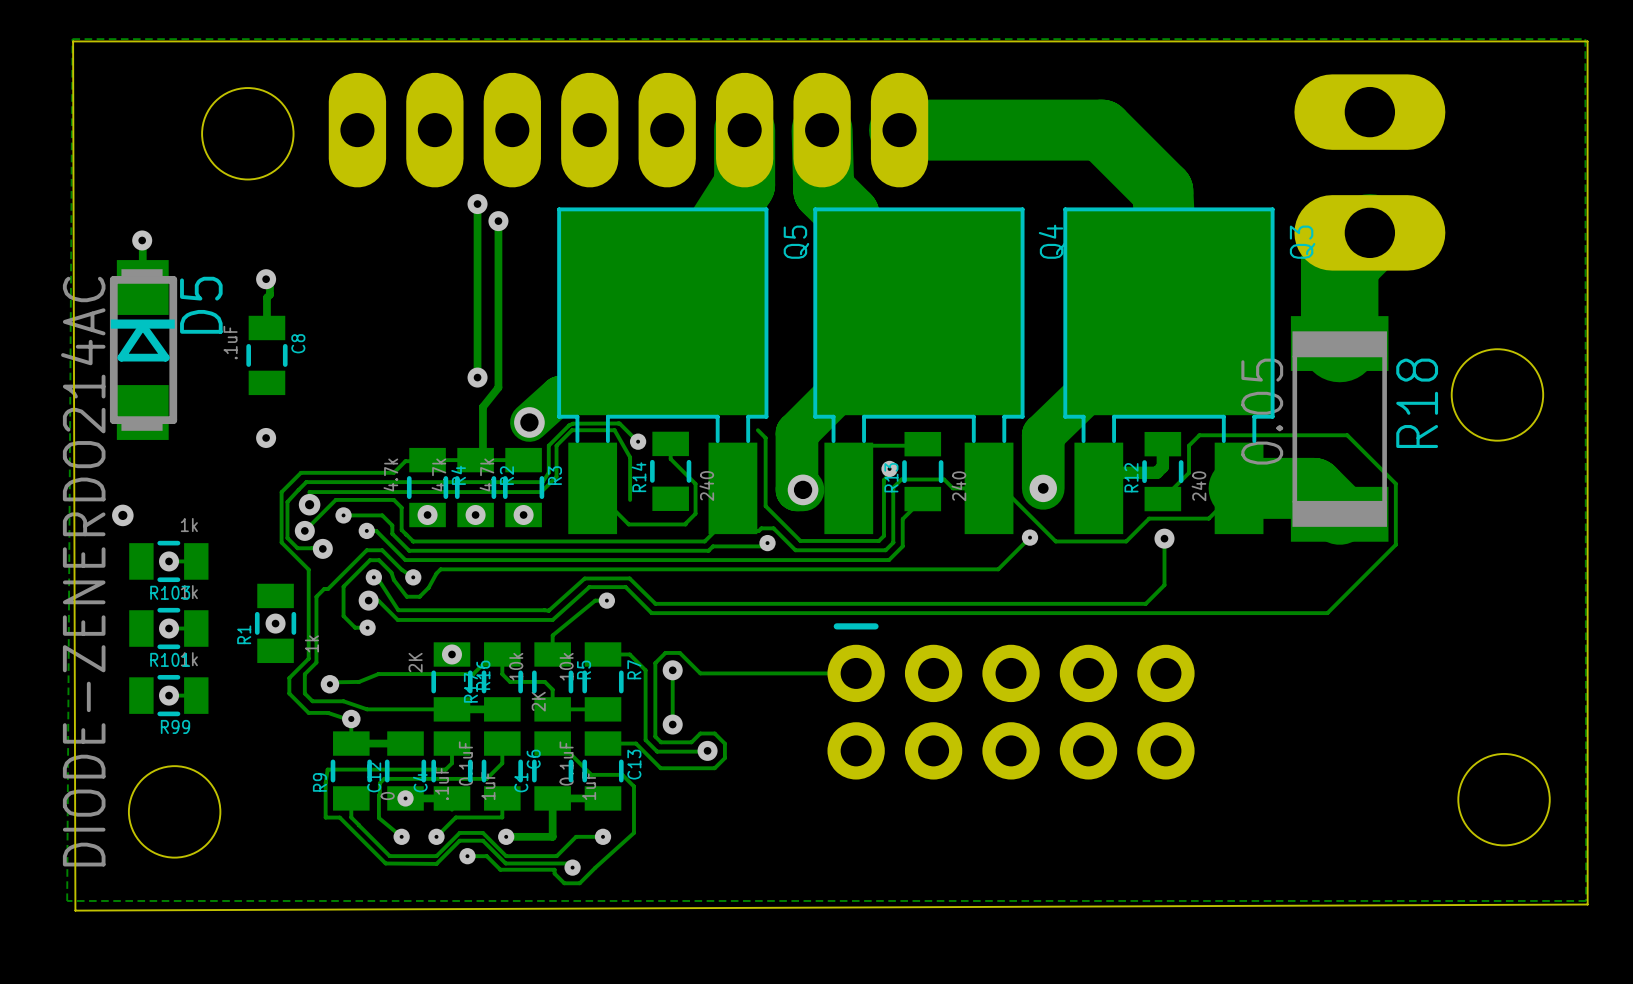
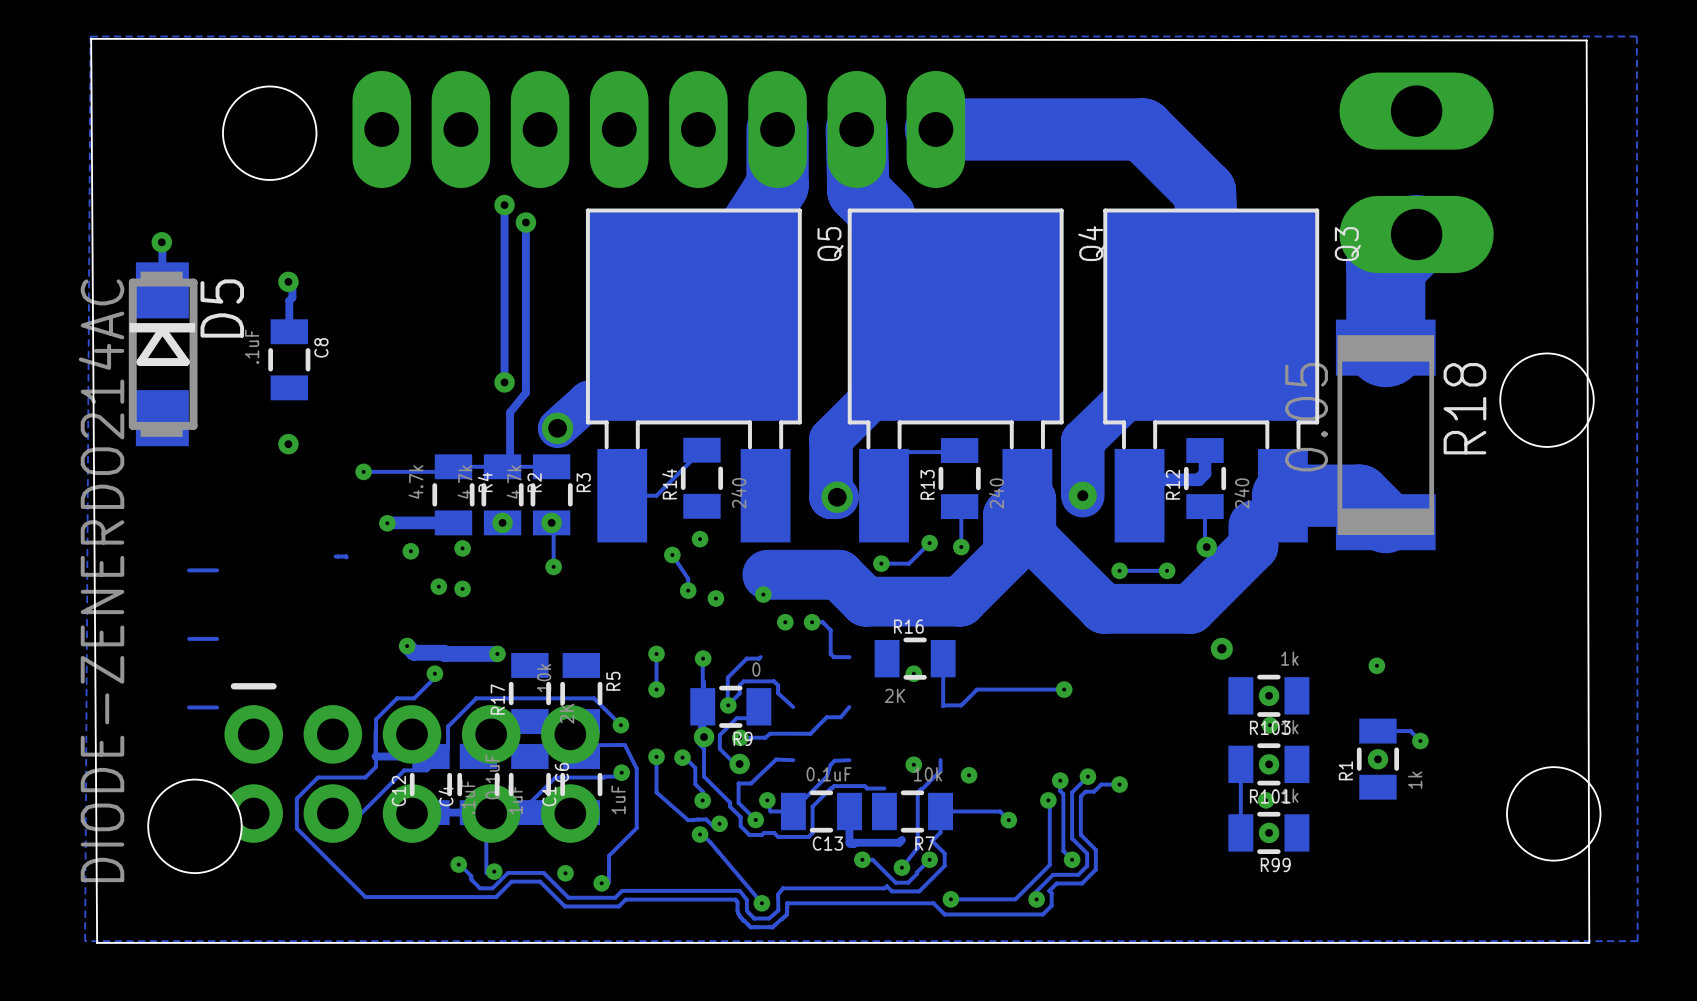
zone outline: (72, 39) (67, 900) (1586, 900) -> (90, 36) (85, 941) (1637, 941) (1637, 917)
board edge: (1587, 41) (73, 41) (75, 910) (1587, 904) (1587, 41) -> (91, 38) (1586, 40) (1589, 942) (97, 942) (91, 38)
track: (757, 430) (765, 437) (765, 506) (800, 540) (878, 540) (883, 535) (883, 479) (889, 474) (889, 468) -> none
track: (637, 441) (619, 423) (572, 423) (548, 445) (548, 472) (542, 482) (306, 482) (287, 501) (287, 538) (297, 548) (312, 548) -> none
via: (638, 441) -> none
track: (670, 443) (670, 458) (695, 483) (695, 513) (685, 524) (628, 524) (592, 488) -> (701, 450) (656, 495) (622, 495)
track: (426, 461) (405, 461) (393, 472) (300, 472) (281, 492) (281, 542) (308, 569) (308, 658) (289, 678) (289, 693) (308, 712) (328, 712) (351, 720) -> (452, 467) (448, 471) (363, 471)
via: none -> (363, 471)
via: (889, 468) -> none
track: (630, 499) (630, 457) (614, 430) (572, 430) (556, 445) (556, 476) (541, 492) (309, 492) (309, 504) -> none
track: (922, 499) (902, 519) (902, 546) (889, 560) (405, 560) (376, 530) (366, 530) -> (959, 506) (961, 508) (961, 547)
track: (1162, 499) (1189, 472) (1189, 445) (1199, 435) (1347, 435) (1395, 483) (1395, 544) (1327, 613) (651, 613) (625, 587) (589, 587) (552, 619) (397, 619) (378, 600) (368, 600) -> (1205, 506) (1205, 540) (1202, 543)
via: (309, 504) -> none
track: none -> (453, 522) (387, 522)
via: (427, 514) -> none
track: none -> (551, 522) (553, 524) (553, 566)
via: (122, 515) -> none
track: (343, 515) (382, 515) (392, 525) (392, 533) (409, 550) (708, 550) (712, 546) (765, 546) (767, 543) -> none
via: (343, 515) -> none
track: (1210, 517) (1149, 518) (1126, 541) (1055, 541) (1002, 488) (953, 488) (944, 479) (901, 479) (893, 487) (893, 542) -> (1253, 525) (1253, 546) (1190, 608) (1103, 608) (1031, 536) (1031, 499) (1027, 495) (1008, 515) (1008, 554) (960, 601) (865, 601) (838, 574) (767, 574) (763, 578) (763, 594)
track: (304, 530) (335, 499) (393, 499) (401, 507) (401, 529) (413, 541) -> none
via: (304, 530) -> none
via position: (366, 530) -> (387, 523)
via: none -> (700, 539)
track: none -> (929, 543) (909, 563) (881, 563)
via: none -> (929, 543)
track: (1030, 537) (998, 569) (440, 569) (428, 587) (419, 596) (406, 596) (393, 579) (391, 572) (379, 560) (369, 560) (343, 586) (343, 616) (355, 627) (367, 627) -> none
via: (1030, 537) -> none
via: none -> (961, 547)
track: (1164, 538) (1164, 585) (1145, 603) (655, 603) (629, 578) (584, 578) (548, 610) (398, 610) (377, 577) (373, 577) -> none
via: none -> (462, 548)
track: (413, 541) (704, 541) (715, 530) (758, 530) (761, 528) (773, 528) (795, 550) (885, 550) (893, 542) -> none
via: none -> (410, 551)
via: (767, 543) -> none
track: none -> (672, 554) (688, 578) (688, 590)
via: none -> (672, 554)
via: (322, 548) -> none
via: none -> (881, 563)
via: none -> (553, 566)
R103 position: (168, 561) -> (1268, 695)
via: (169, 561) -> none
via: none -> (1119, 570)
track: none -> (1167, 570) (1119, 570)
via: none -> (1167, 570)
via: (373, 577) -> none
track: (413, 577) (401, 569) (382, 550) (366, 550) (328, 588) (324, 588) (316, 596) (316, 662) (304, 674) (304, 693) (312, 701) (343, 701) (367, 709) (502, 709) (451, 709) -> none
via: none -> (462, 588)
via: none -> (688, 590)
via: none -> (763, 594)
via: none -> (715, 598)
via: (368, 600) -> none
track: (606, 600) (595, 600) (552, 635) (552, 654) -> none
via: (606, 600) -> none
via: none -> (785, 622)
track: none -> (812, 622) (808, 622) (822, 622) (830, 630) (830, 653) (833, 657) (849, 657)
via: none -> (812, 622)
R1 position: (275, 623) -> (1377, 759)
via: (275, 623) -> none
via position: (367, 627) -> (407, 646)
R101 position: (168, 628) -> (1268, 764)
via: (169, 628) -> none
track: none -> (407, 646) (413, 652) (497, 653)
via: none -> (1221, 648)
via: none -> (497, 653)
track: none -> (656, 653) (656, 689)
via: none -> (656, 653)
track: none -> (760, 657) (746, 658) (727, 677) (727, 705) (739, 693) (739, 685) (743, 681) (774, 681) (778, 685) (778, 693) (793, 707)
via: none -> (703, 658)
track: none -> (943, 658) (943, 706) (961, 705) (977, 689) (1064, 689)
track: none -> (702, 659) (700, 744) (704, 748) (704, 776) (729, 802) (729, 806) (740, 817) (740, 826) (749, 834) (774, 832) (778, 836) (808, 836) (812, 832) (812, 806) (834, 786) (884, 788)
via: (451, 654) -> none
track: (603, 654) (629, 654) (645, 670) (645, 740) (657, 751) (707, 750) -> none
via: none -> (1376, 665)
track: none -> (434, 673) (434, 677) (414, 698) (397, 698) (376, 719) (376, 766) (365, 777) (317, 777) (296, 798) (296, 828) (365, 897) (496, 897) (511, 881) (540, 881) (564, 906) (618, 906) (625, 899) (735, 899) (739, 916) (750, 927) (772, 927)
via: none -> (434, 673)
via: none -> (913, 673)
via: (672, 670) -> none
track: (856, 673) (700, 673) (679, 652) (665, 652) (655, 663) (655, 736) (661, 742) (691, 742) (700, 733) (714, 733) (724, 743) (724, 758) (714, 768) (660, 768) (635, 743) (603, 743) -> none
via: none -> (656, 689)
via: none -> (1064, 689)
R16 rotation: 0° (451, 681) -> 90° clockwise (915, 658)
R16 position: (451, 681) -> (915, 658)
R7 rotation: 0° (603, 681) -> 90° clockwise (912, 811)
R7 position: (603, 681) -> (912, 811)
track: (329, 684) (328, 682) (359, 681) (378, 674) (473, 674) (492, 654) (502, 654) (502, 674) (510, 681) (544, 681) (552, 689) (552, 709) (603, 709) -> none
via: (329, 684) -> none
via: none -> (1269, 695)
via: none -> (728, 705)
R99 position: (168, 695) -> (1268, 832)
via: (169, 695) -> none
track: none -> (849, 707) (840, 717) (826, 717) (810, 733) (770, 733) (765, 737) (740, 737)
track: none -> (758, 713) (753, 718) (736, 718) (719, 735) (719, 748) (739, 768) (744, 768)
part position: (1011, 701) -> (412, 762)
track: none -> (620, 725) (594, 698) (476, 698) (448, 726) (448, 749) (426, 770) (404, 770) (361, 813) (332, 813)
via: none -> (620, 725)
via: none -> (1270, 725)
via: (351, 718) -> none
track: none -> (1377, 731) (1410, 731) (1420, 741)
track: none -> (570, 734) (573, 745) (624, 744) (636, 768) (636, 828) (609, 855) (609, 882)
via: none -> (740, 737)
via: none -> (1420, 741)
track: (451, 743) (451, 763) (445, 769) (327, 769) (325, 817) (339, 817) (385, 863) (436, 863) (459, 840) (482, 840) (505, 863) (567, 863) (572, 867) -> none
track: (502, 743) (502, 763) (486, 778) (384, 778) (379, 783) (378, 817) (401, 836) -> none
track: (552, 743) (560, 743) (591, 774) (622, 774) (633, 786) (633, 832) (579, 883) (564, 883) (554, 873) (554, 869) (500, 869) (486, 856) (467, 856) -> none
track: none -> (656, 756) (656, 792) (688, 820) (706, 819) (715, 828) (719, 823)
via: none -> (656, 756)
track: none -> (682, 757) (684, 756) (695, 767) (695, 784) (702, 791) (702, 800)
via: none -> (682, 757)
via: none -> (1377, 759)
track: none -> (793, 760) (776, 759) (751, 783) (738, 783) (738, 802) (759, 823)
track: none -> (849, 760) (834, 760) (830, 764) (826, 776) (793, 811) (770, 811) (767, 800)
track: none -> (940, 760) (940, 770) (917, 792) (917, 847) (901, 867)
via: none -> (913, 764)
track: none -> (1240, 764) (1240, 832)
via: none -> (1269, 764)
track: none -> (621, 772) (616, 776) (555, 777) (519, 813) (491, 813) (486, 818) (486, 873)
via: none -> (621, 772)
via: none -> (969, 775)
track: none -> (1087, 776) (1072, 792) (1072, 838) (1087, 853) (1087, 865) (1078, 874) (1053, 874) (1032, 895) (1036, 899)
via: none -> (1087, 776)
track: none -> (1060, 780) (1060, 790) (1063, 794) (1063, 851) (1072, 859)
via: none -> (1060, 780)
R9 rotation: 0° (351, 770) -> 90° clockwise (730, 706)
R9 position: (351, 770) -> (730, 706)
C13 rotation: 0° (603, 770) -> 90° clockwise (821, 811)
C13 position: (603, 770) -> (821, 811)
track: none -> (1119, 784) (1101, 784) (1094, 791) (1085, 791) (1080, 796) (1080, 834) (1095, 849) (1095, 869) (1081, 883) (1056, 883) (1049, 890) (1051, 893) (1051, 905) (1042, 914) (944, 914) (933, 903) (787, 903) (787, 913)
via: none -> (1119, 784)
via: none -> (702, 800)
via: none -> (767, 800)
track: none -> (1048, 800) (1049, 864) (1015, 899) (950, 899)
via: none -> (1048, 800)
via: none -> (1266, 800)
track: none -> (849, 811) (850, 843) (899, 842) (901, 839)
track: (351, 798) (351, 817) (389, 856) (436, 856) (459, 832) (482, 832) (506, 856) (556, 856) (576, 836) (603, 836) -> none
via: (405, 798) -> none
track: (502, 798) (502, 817) (455, 817) (436, 836) -> none
track: (603, 798) (552, 798) (552, 836) (506, 836) -> none
via: none -> (755, 819)
track: none -> (1008, 820) (1000, 811) (940, 811) (940, 832) (932, 840) (944, 853) (944, 865) (919, 891) (892, 891) (886, 886) (884, 888) (782, 888) (778, 894) (778, 910) (769, 918) (754, 918) (747, 910) (746, 899) (739, 890) (622, 890) (615, 897) (568, 897) (543, 872) (508, 872) (492, 888) (480, 888) (471, 879) (471, 876) (458, 864)
via: none -> (1008, 820)
via: none -> (719, 823)
via: none -> (1269, 832)
track: none -> (700, 834) (710, 842) (761, 903)
via: none -> (700, 834)
via: (401, 836) -> none
via position: (436, 836) -> (458, 864)
via: (506, 836) -> none
via: (603, 836) -> none
via: none -> (862, 859)
track: none -> (929, 859) (908, 882) (895, 882) (872, 859) (858, 859)
via: none -> (929, 859)
via: none -> (1072, 859)
via: none -> (901, 867)
via: none -> (565, 873)
via: none -> (950, 899)
via: none -> (1036, 899)
via: none -> (761, 903)
track: none -> (786, 914) (782, 919)
track: none -> (781, 919) (772, 927)

